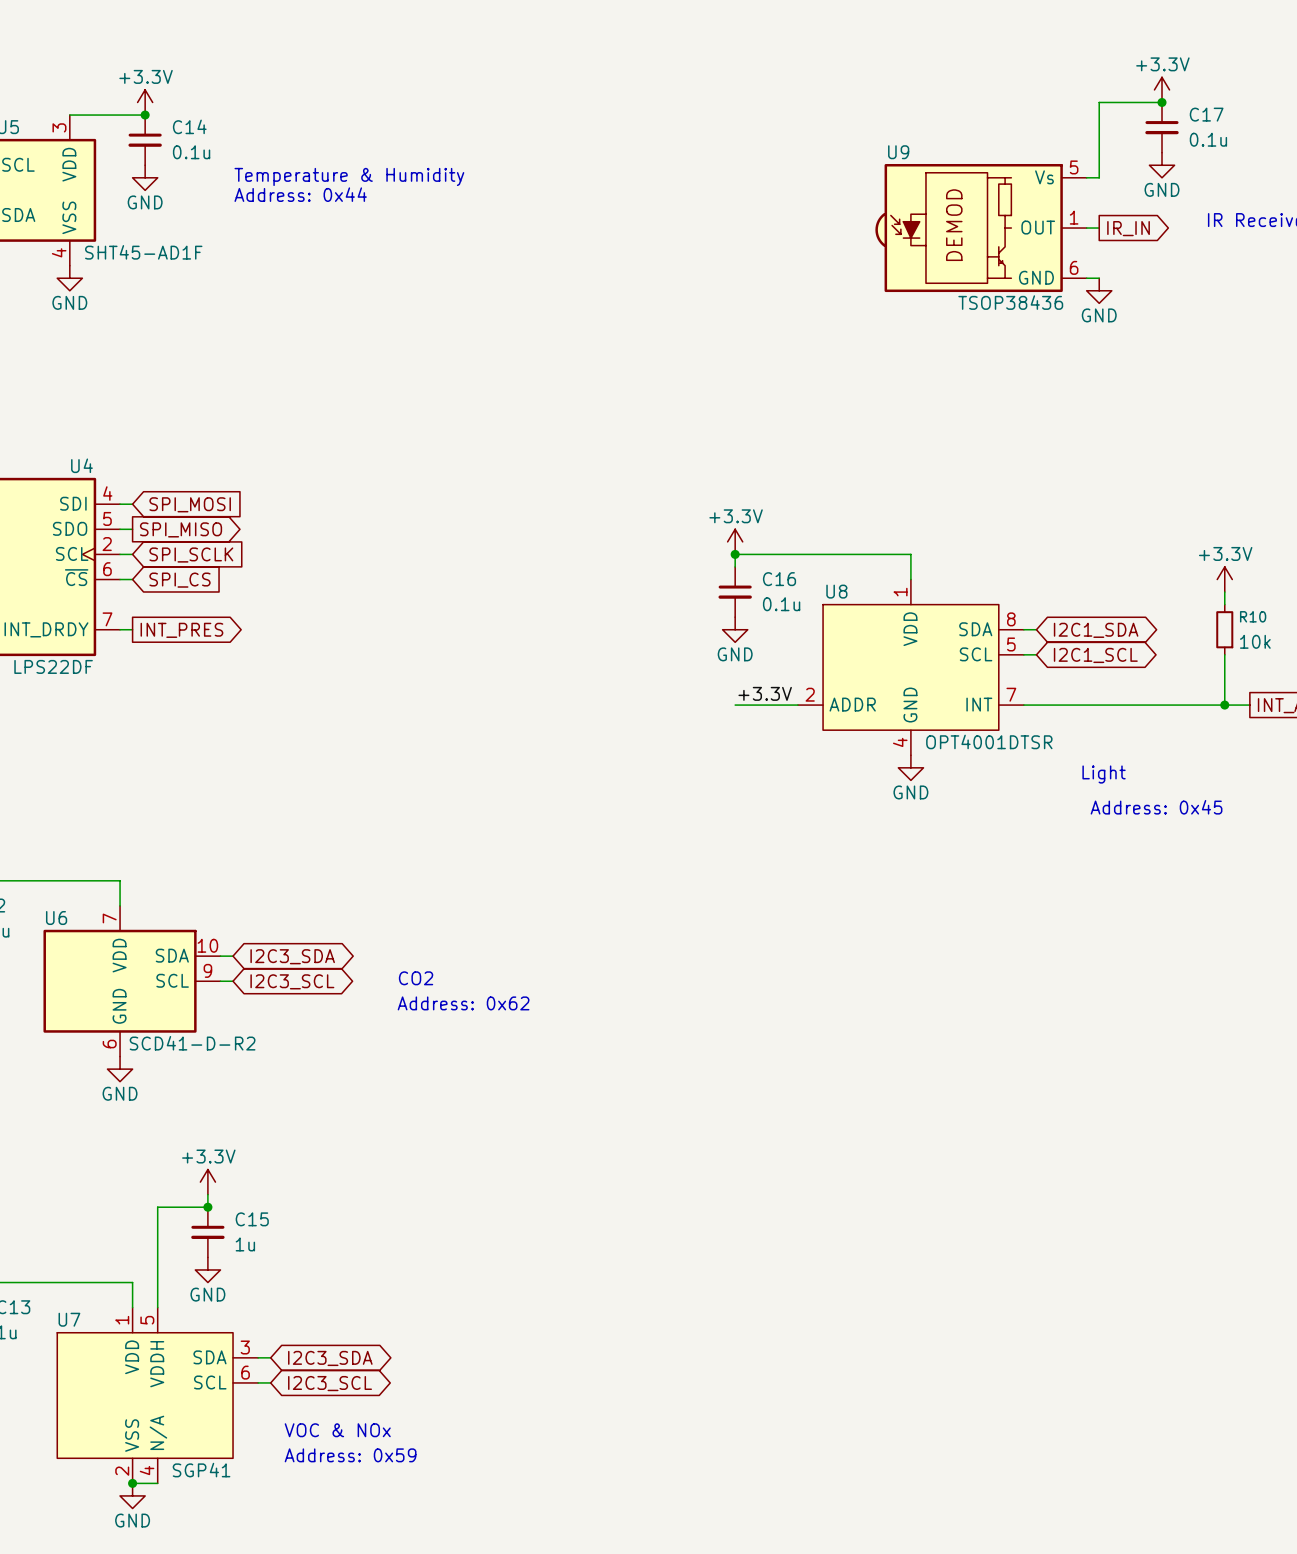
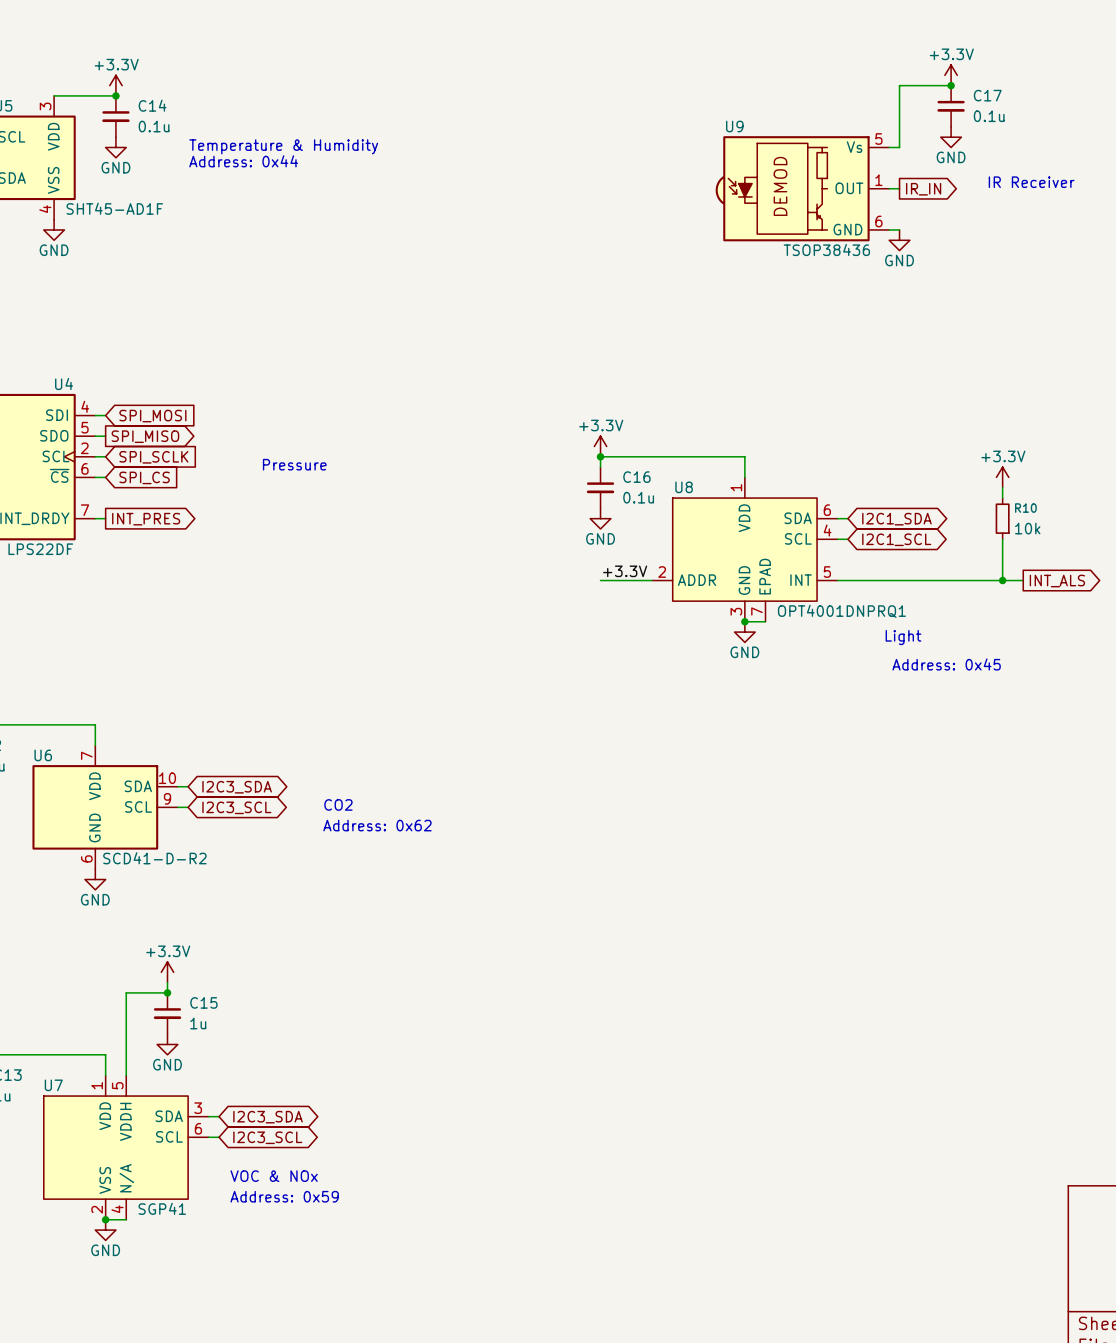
text: none -> Pressure (294, 464)
U8 symbol: [797, 579, 1024, 756] -> [652, 477, 838, 622]
U8 value: OPT4001DTSR (989, 741) -> OPT4001DNPRQ1 (841, 611)
wire: none -> (744, 621) (765, 621)
junction: none -> (744, 621)

